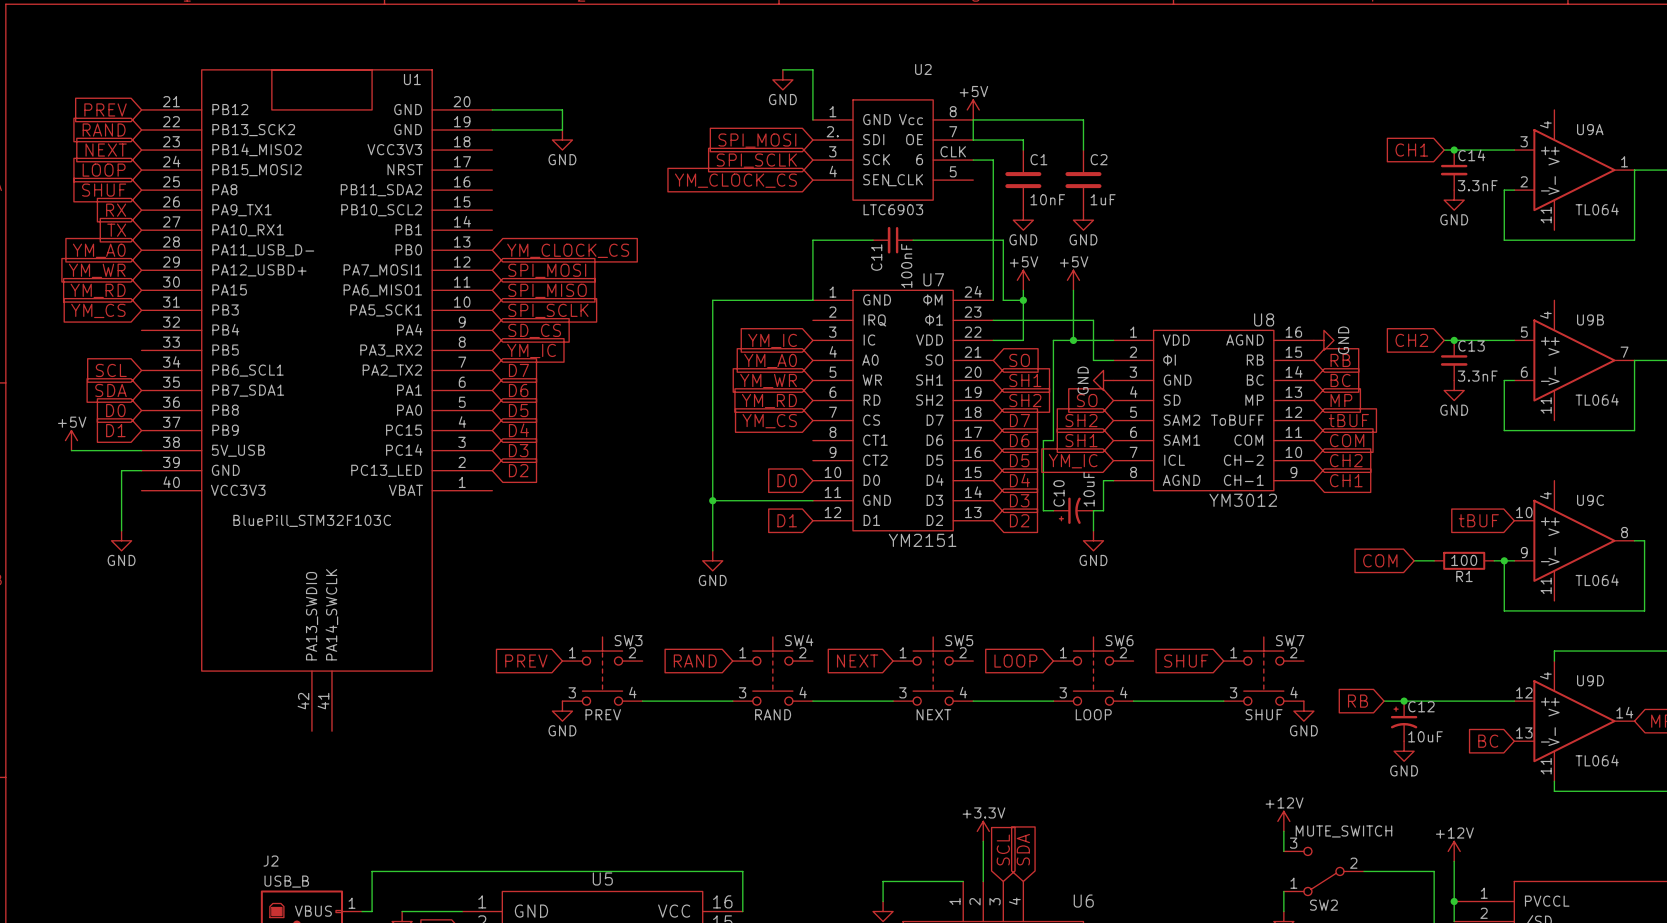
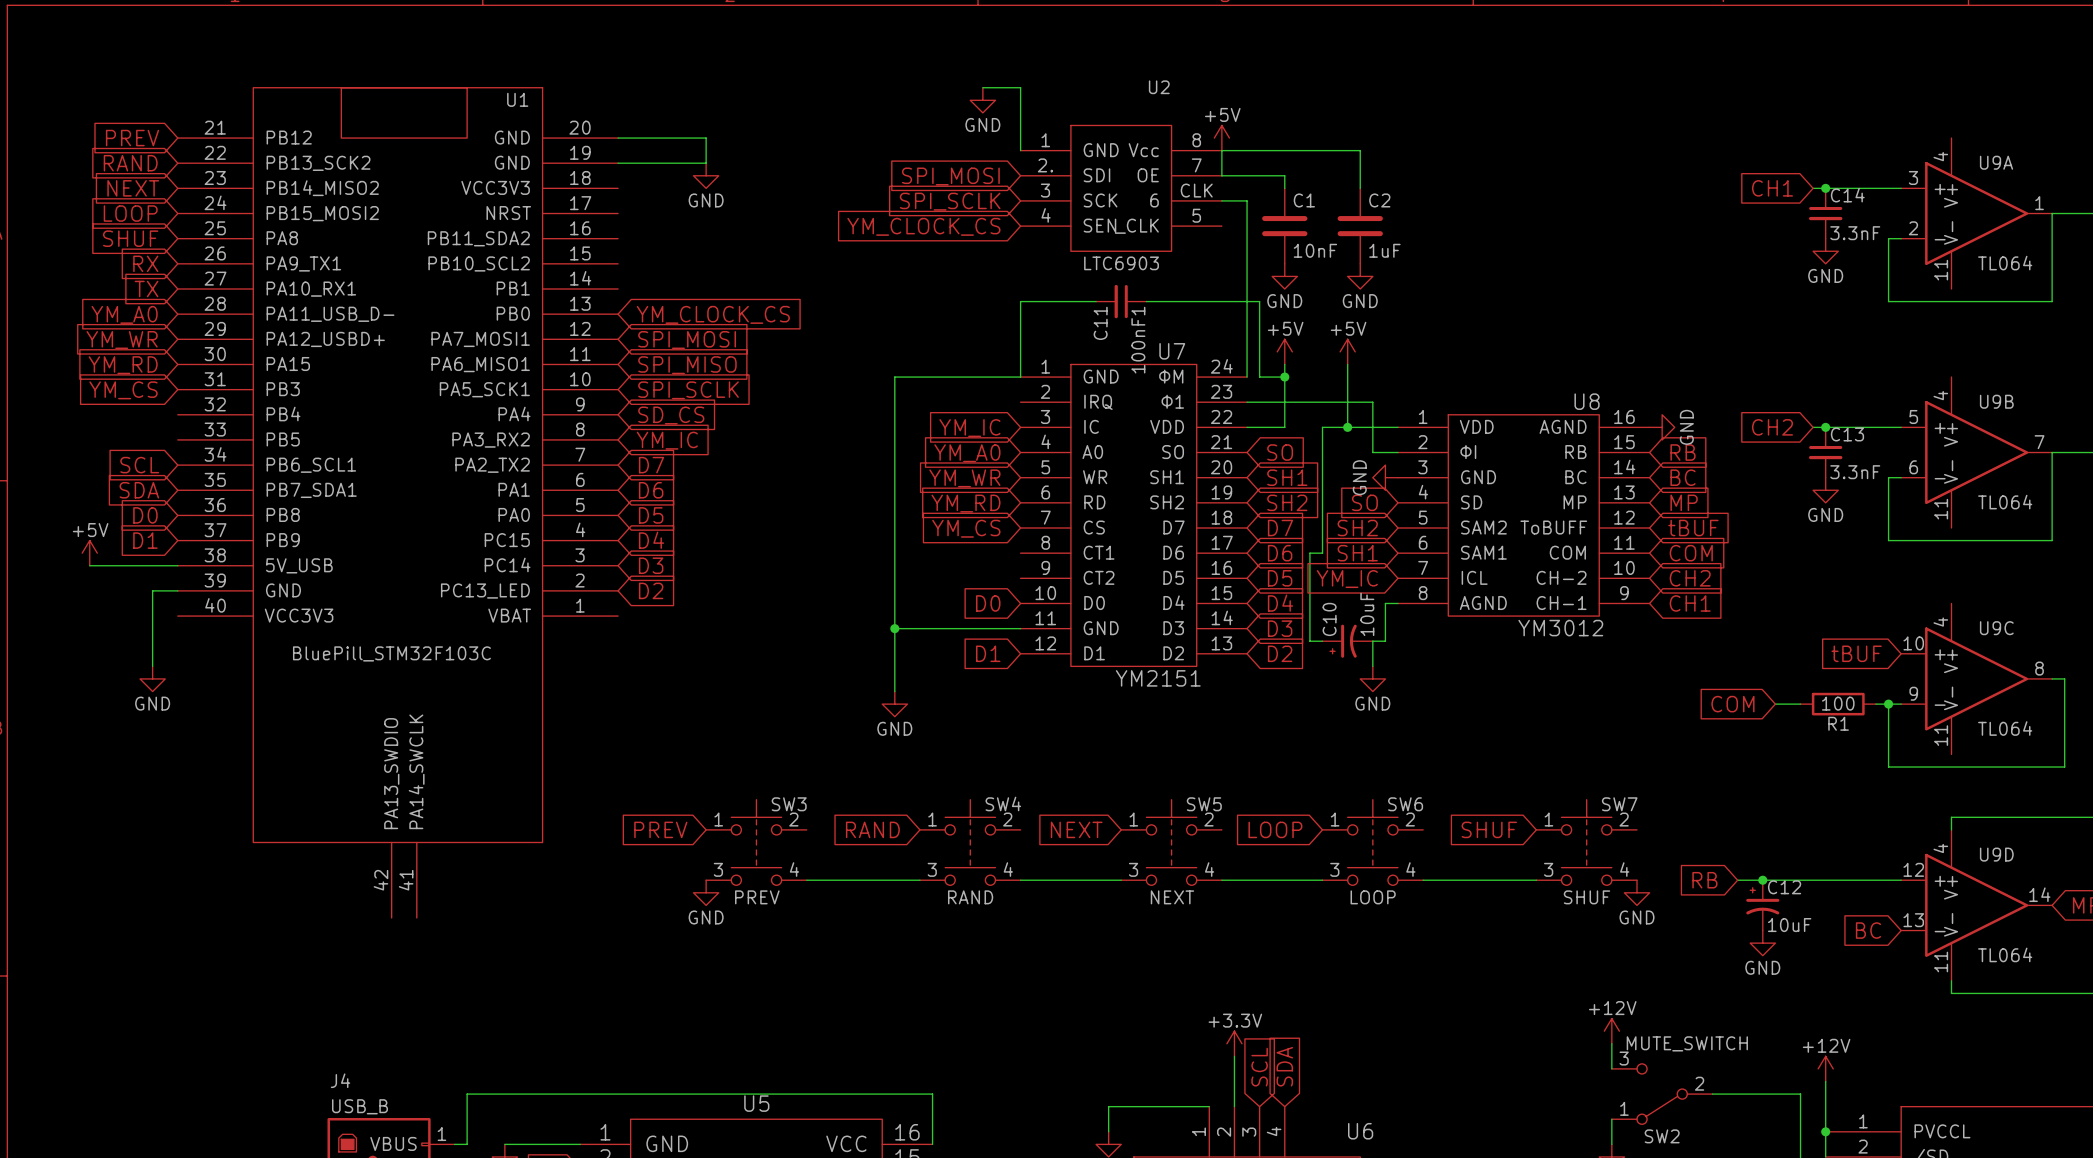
100nF name: 100nF (906, 265) -> 100nF1 (1138, 340)
J2 name: J2 (270, 861) -> J4 (340, 1080)

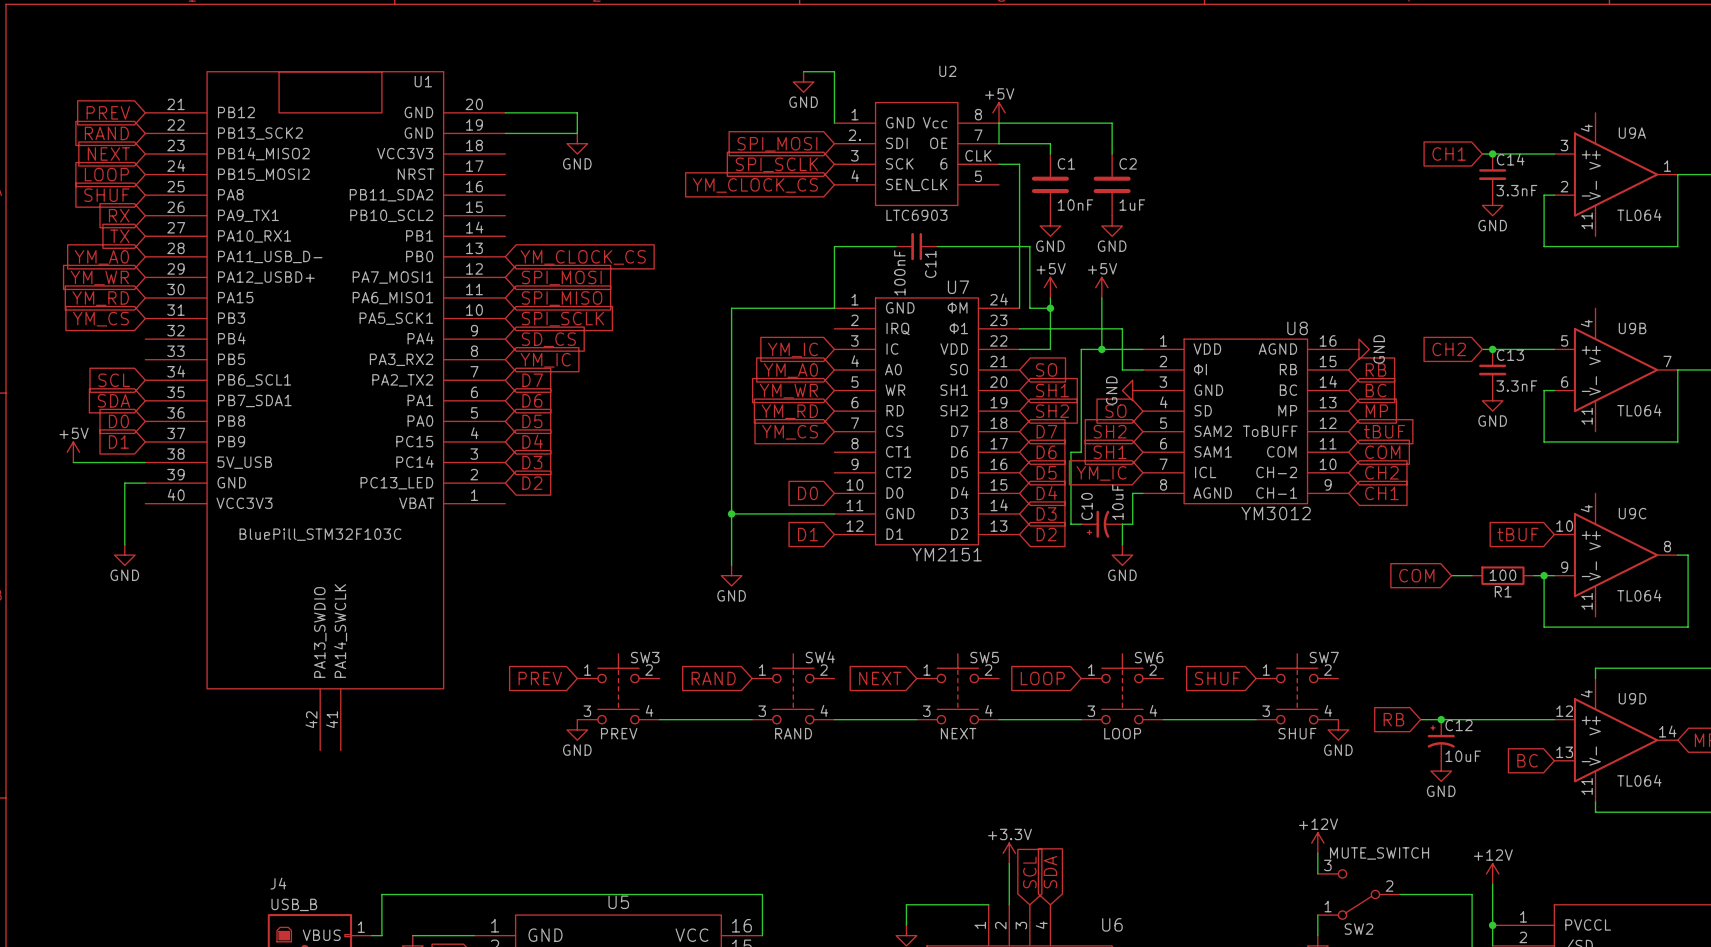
100nF1 value: C11 (1100, 323) -> 100nF (899, 272)
100nF1 name: 100nF1 (1138, 340) -> C11 (930, 264)

